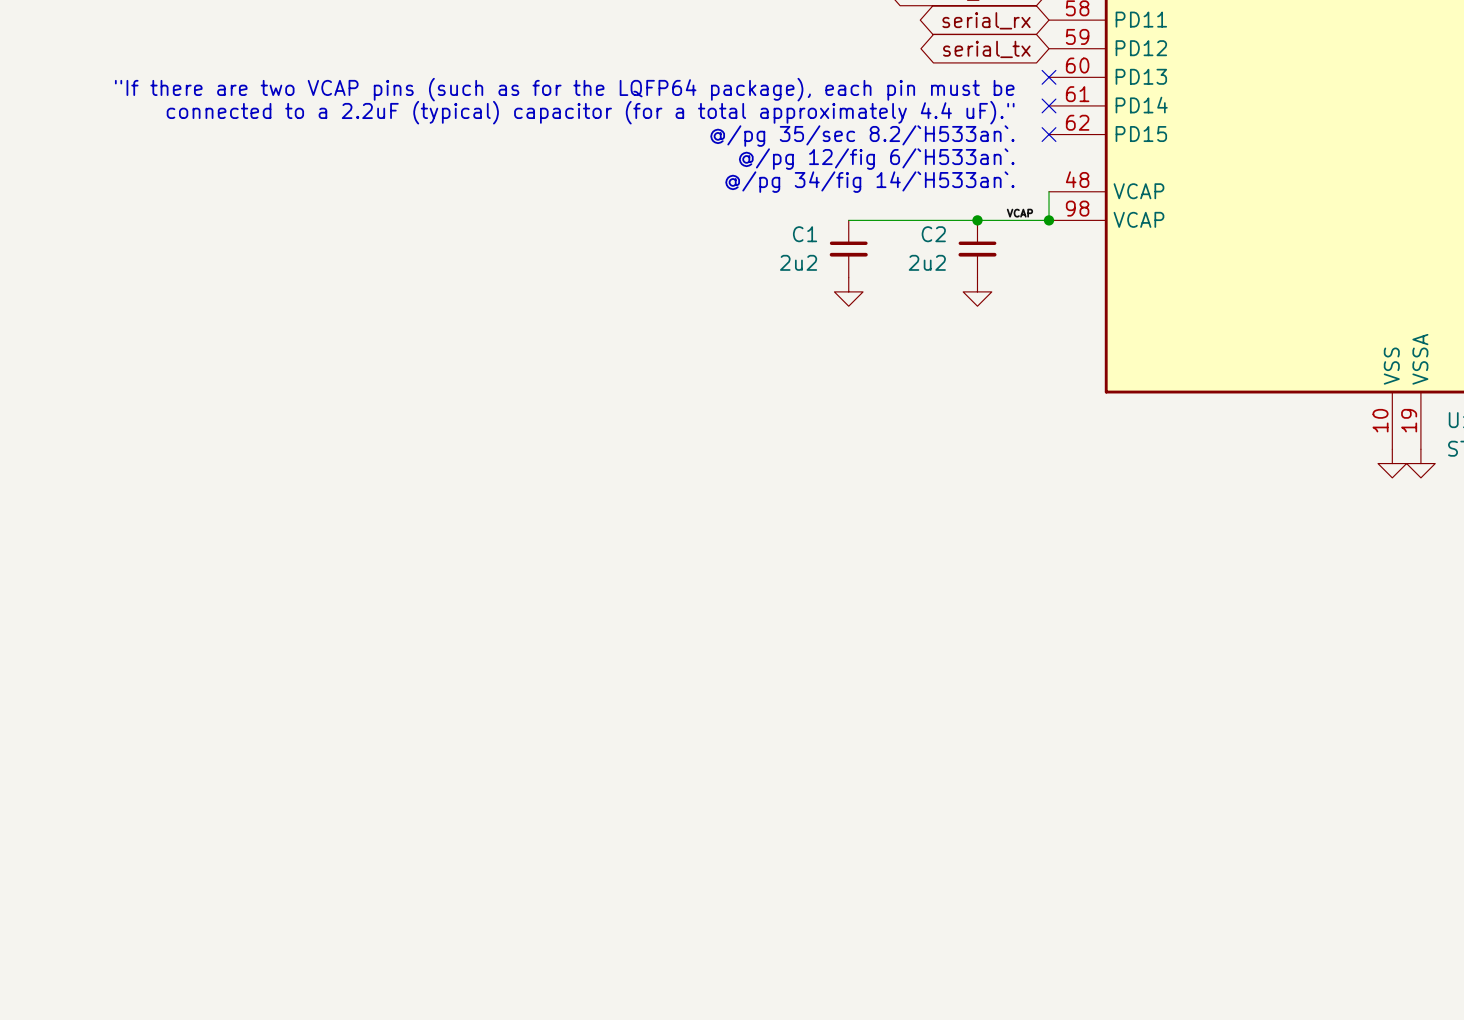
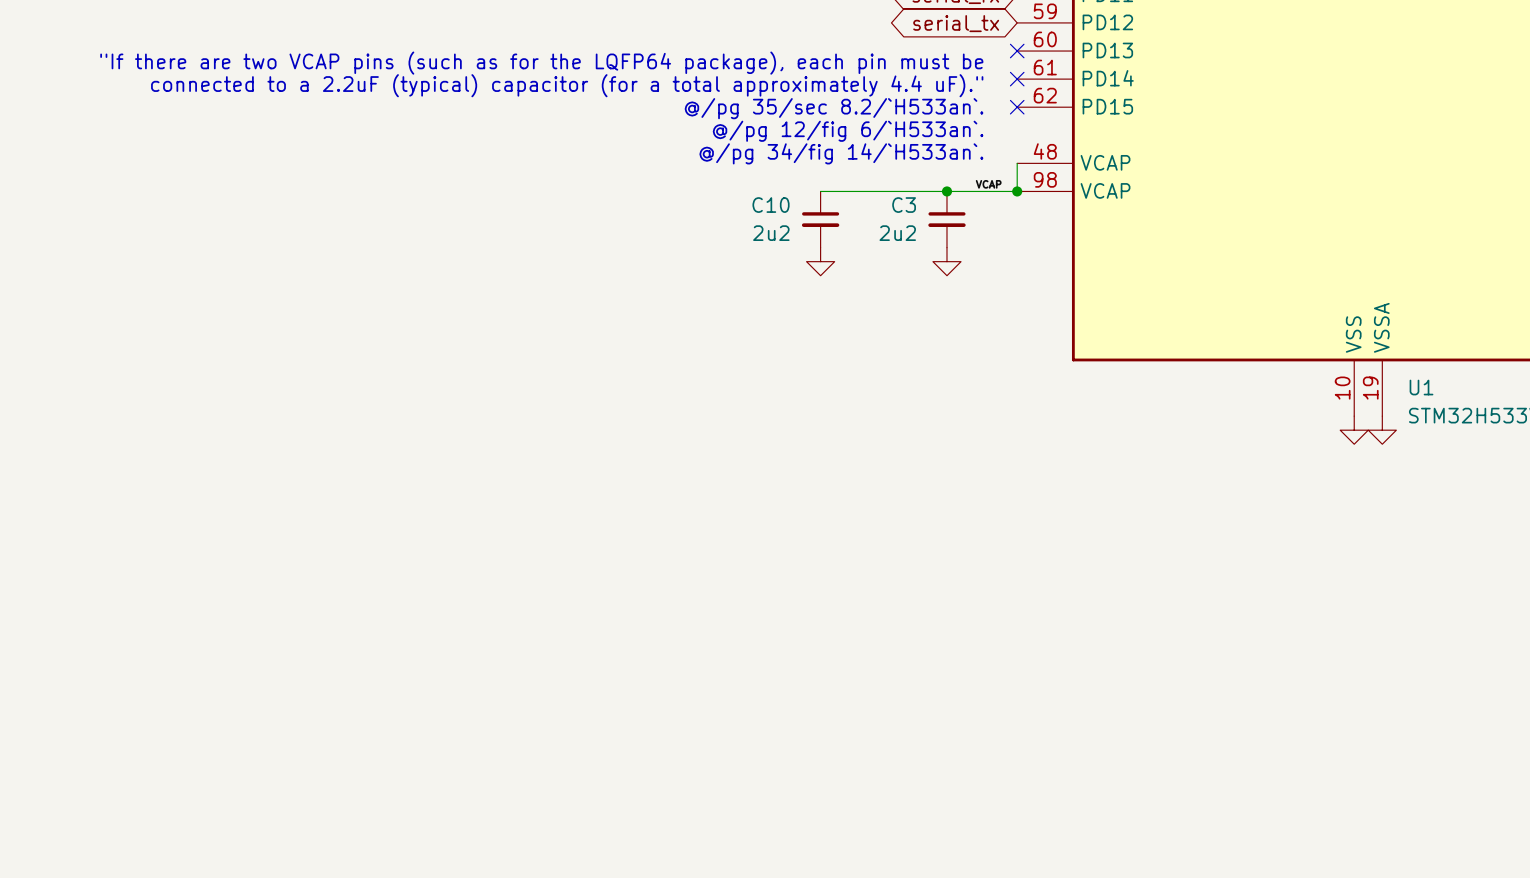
C1 name: C1 (805, 234) -> C10 (771, 205)
C2 name: C2 (933, 234) -> C3 (904, 205)

